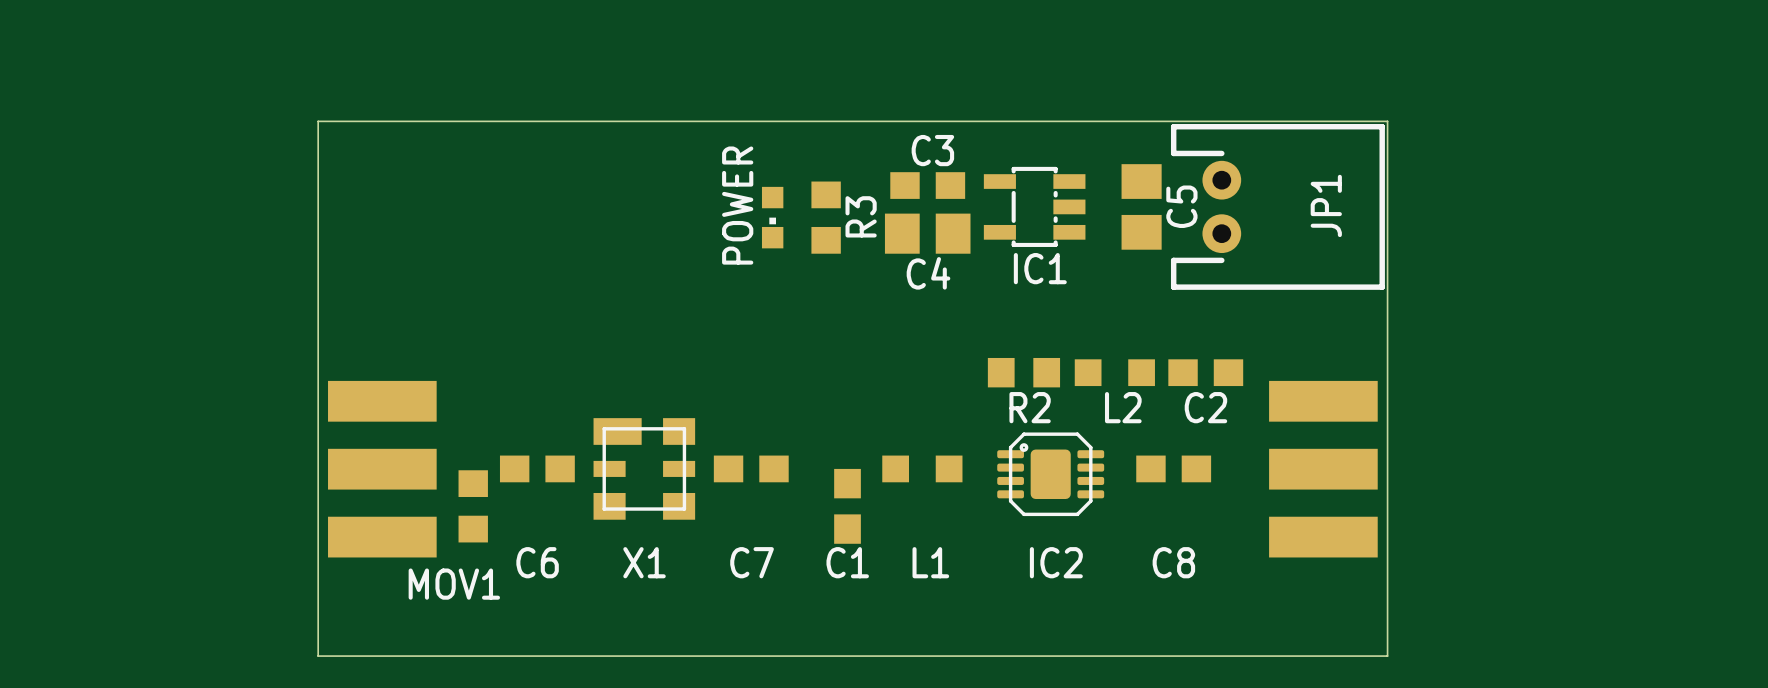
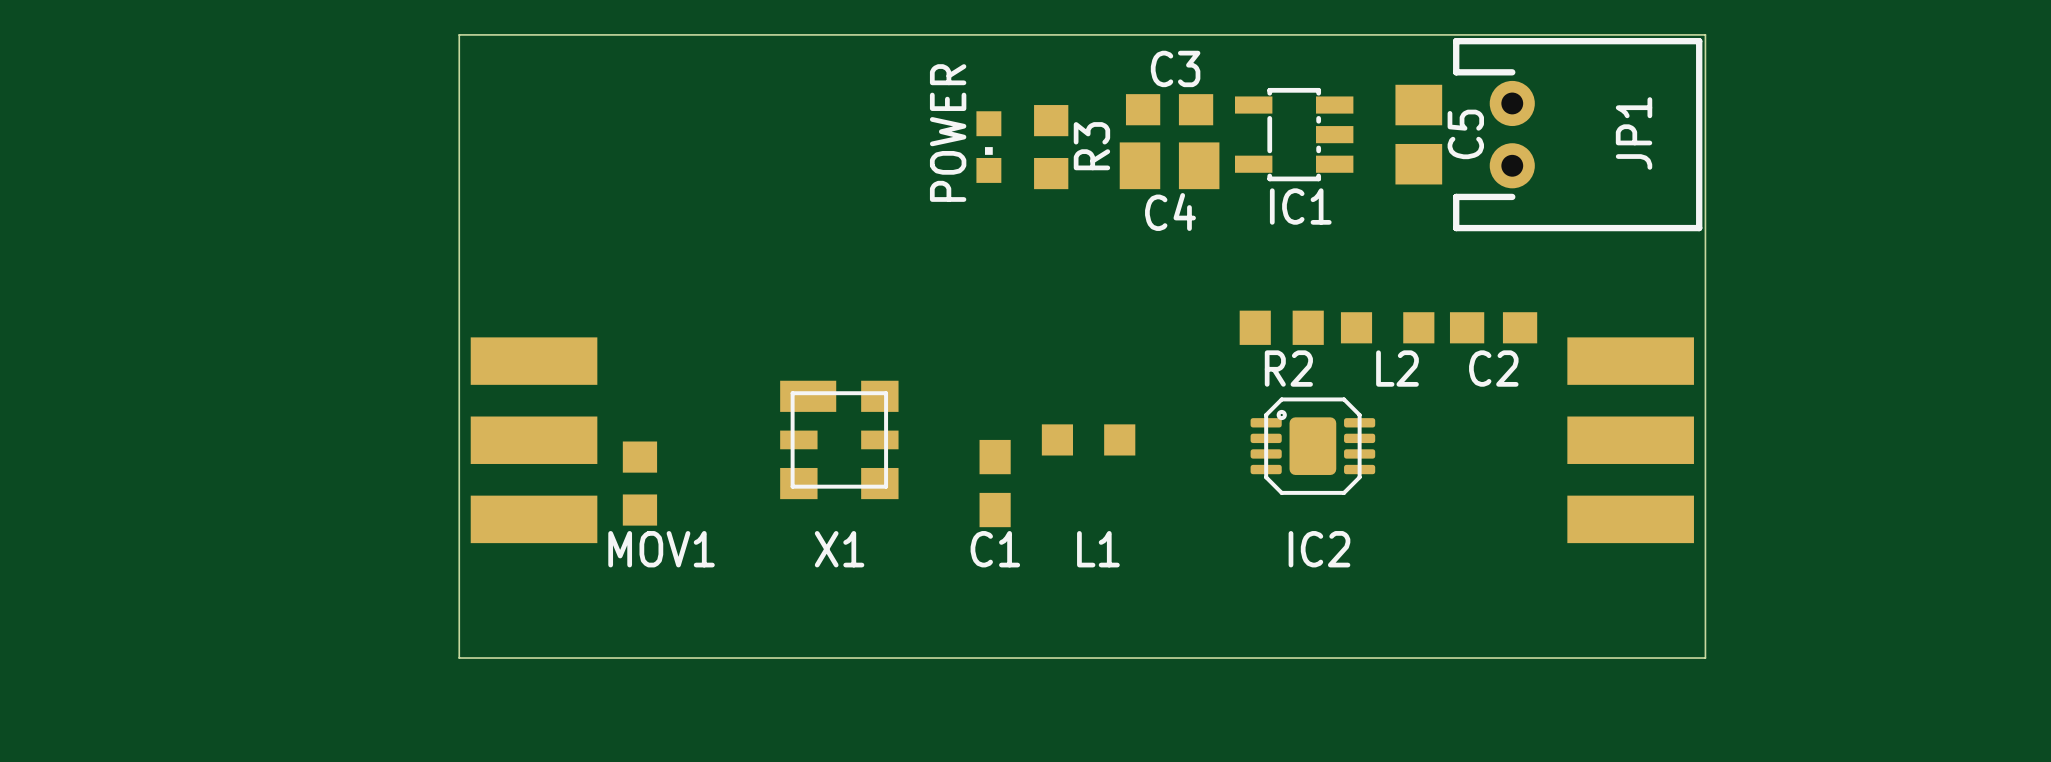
C6: (537, 468) -> none
C7: (751, 468) -> none
L1 position: (922, 468) -> (1088, 439)
C8: (1173, 468) -> none
C1 position: (847, 506) -> (995, 483)
MOV1 name position: MOV1 (454, 584) -> MOV1 (661, 549)

